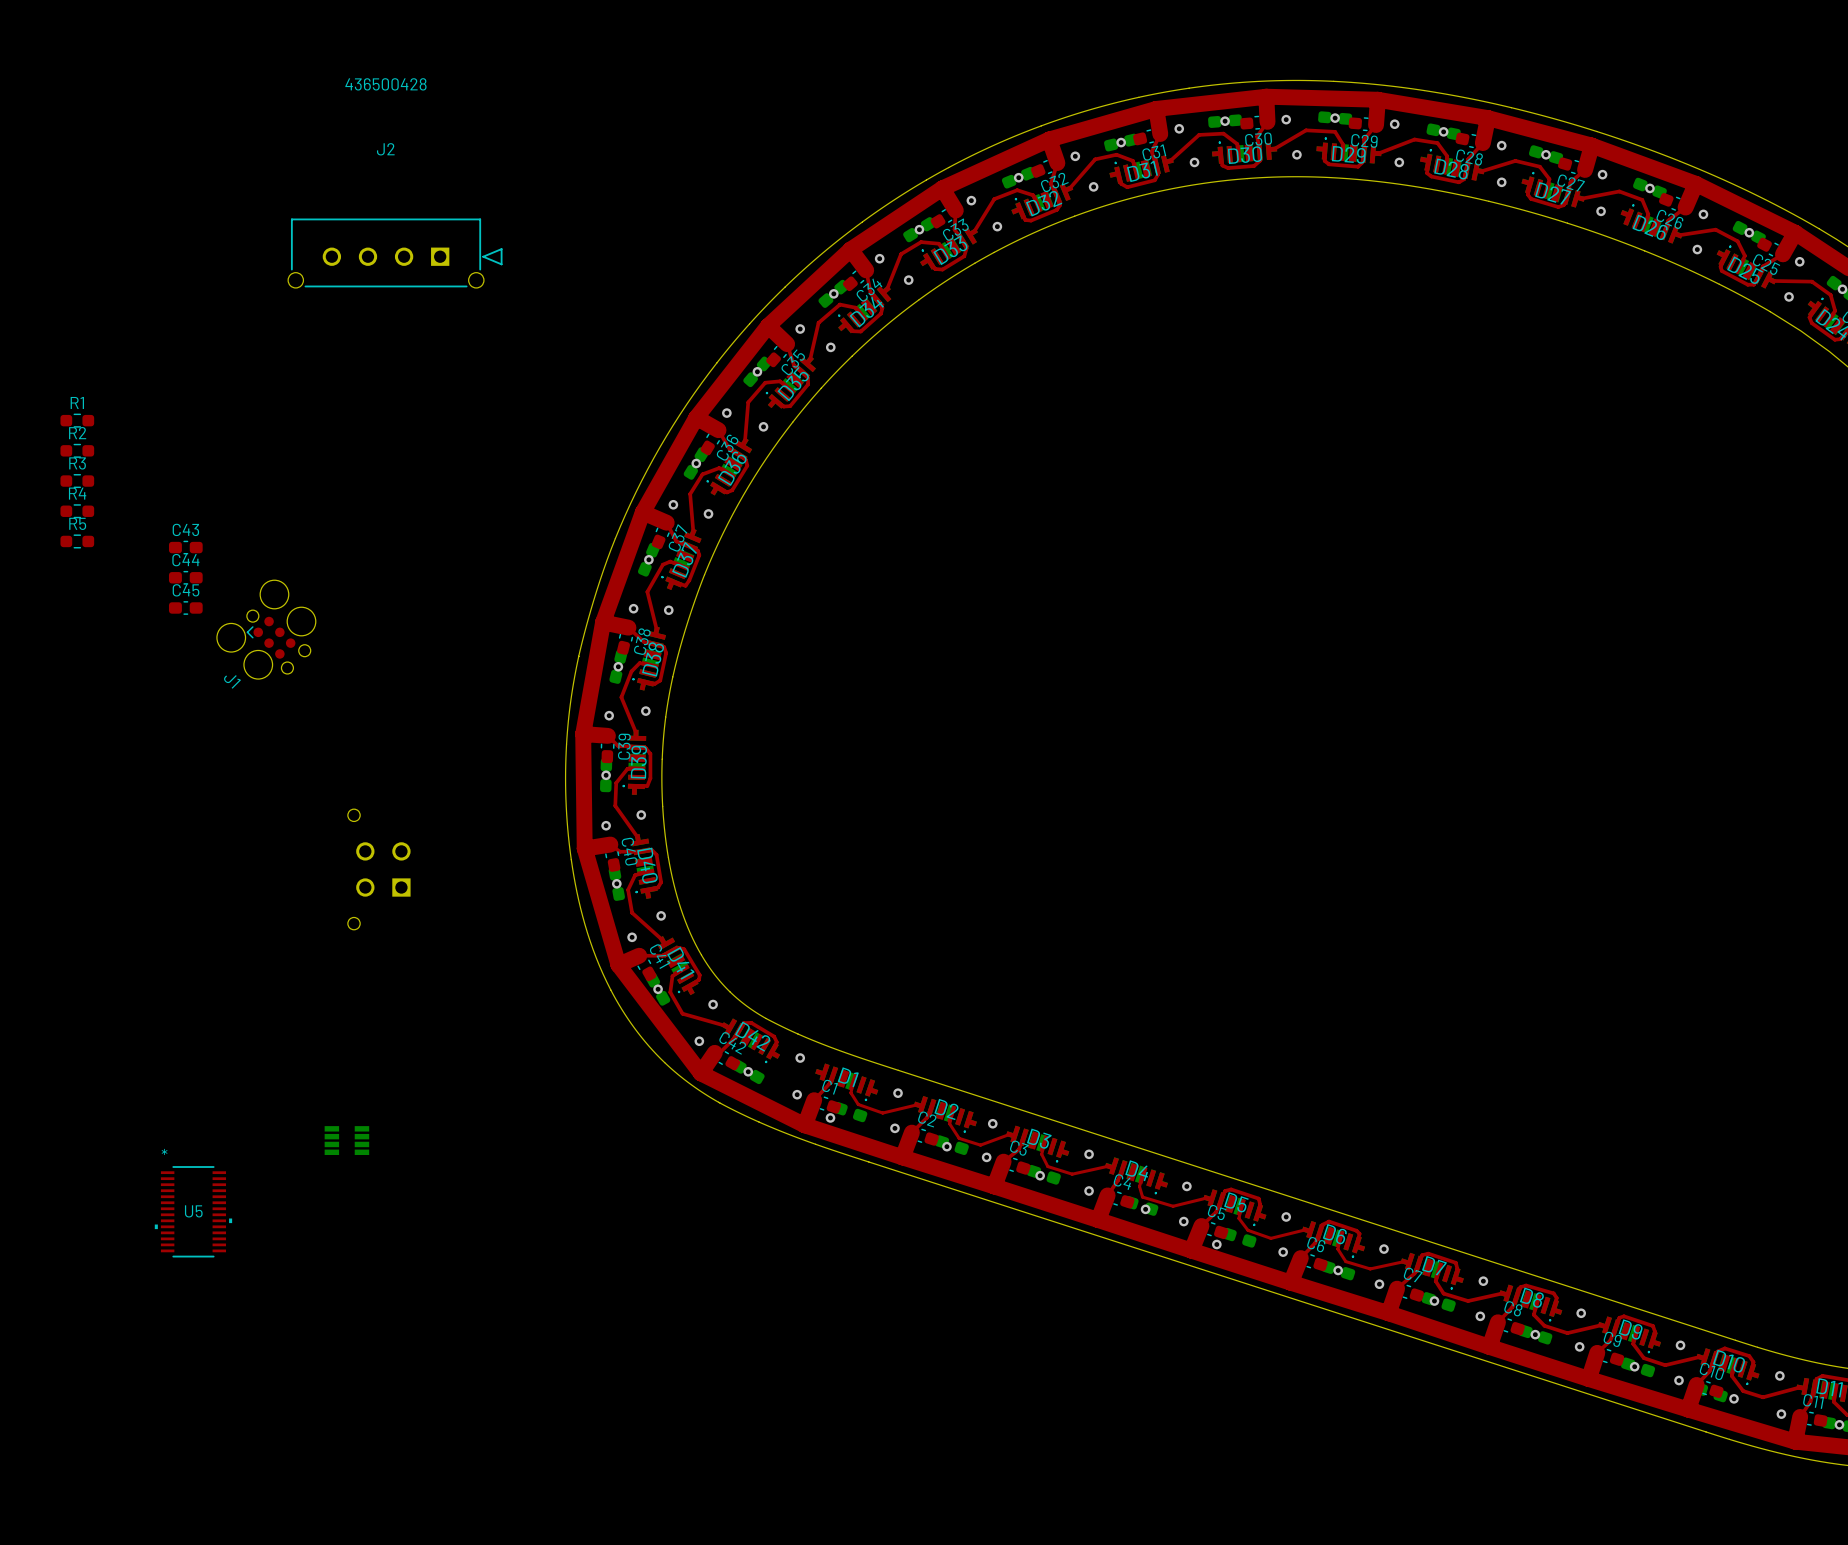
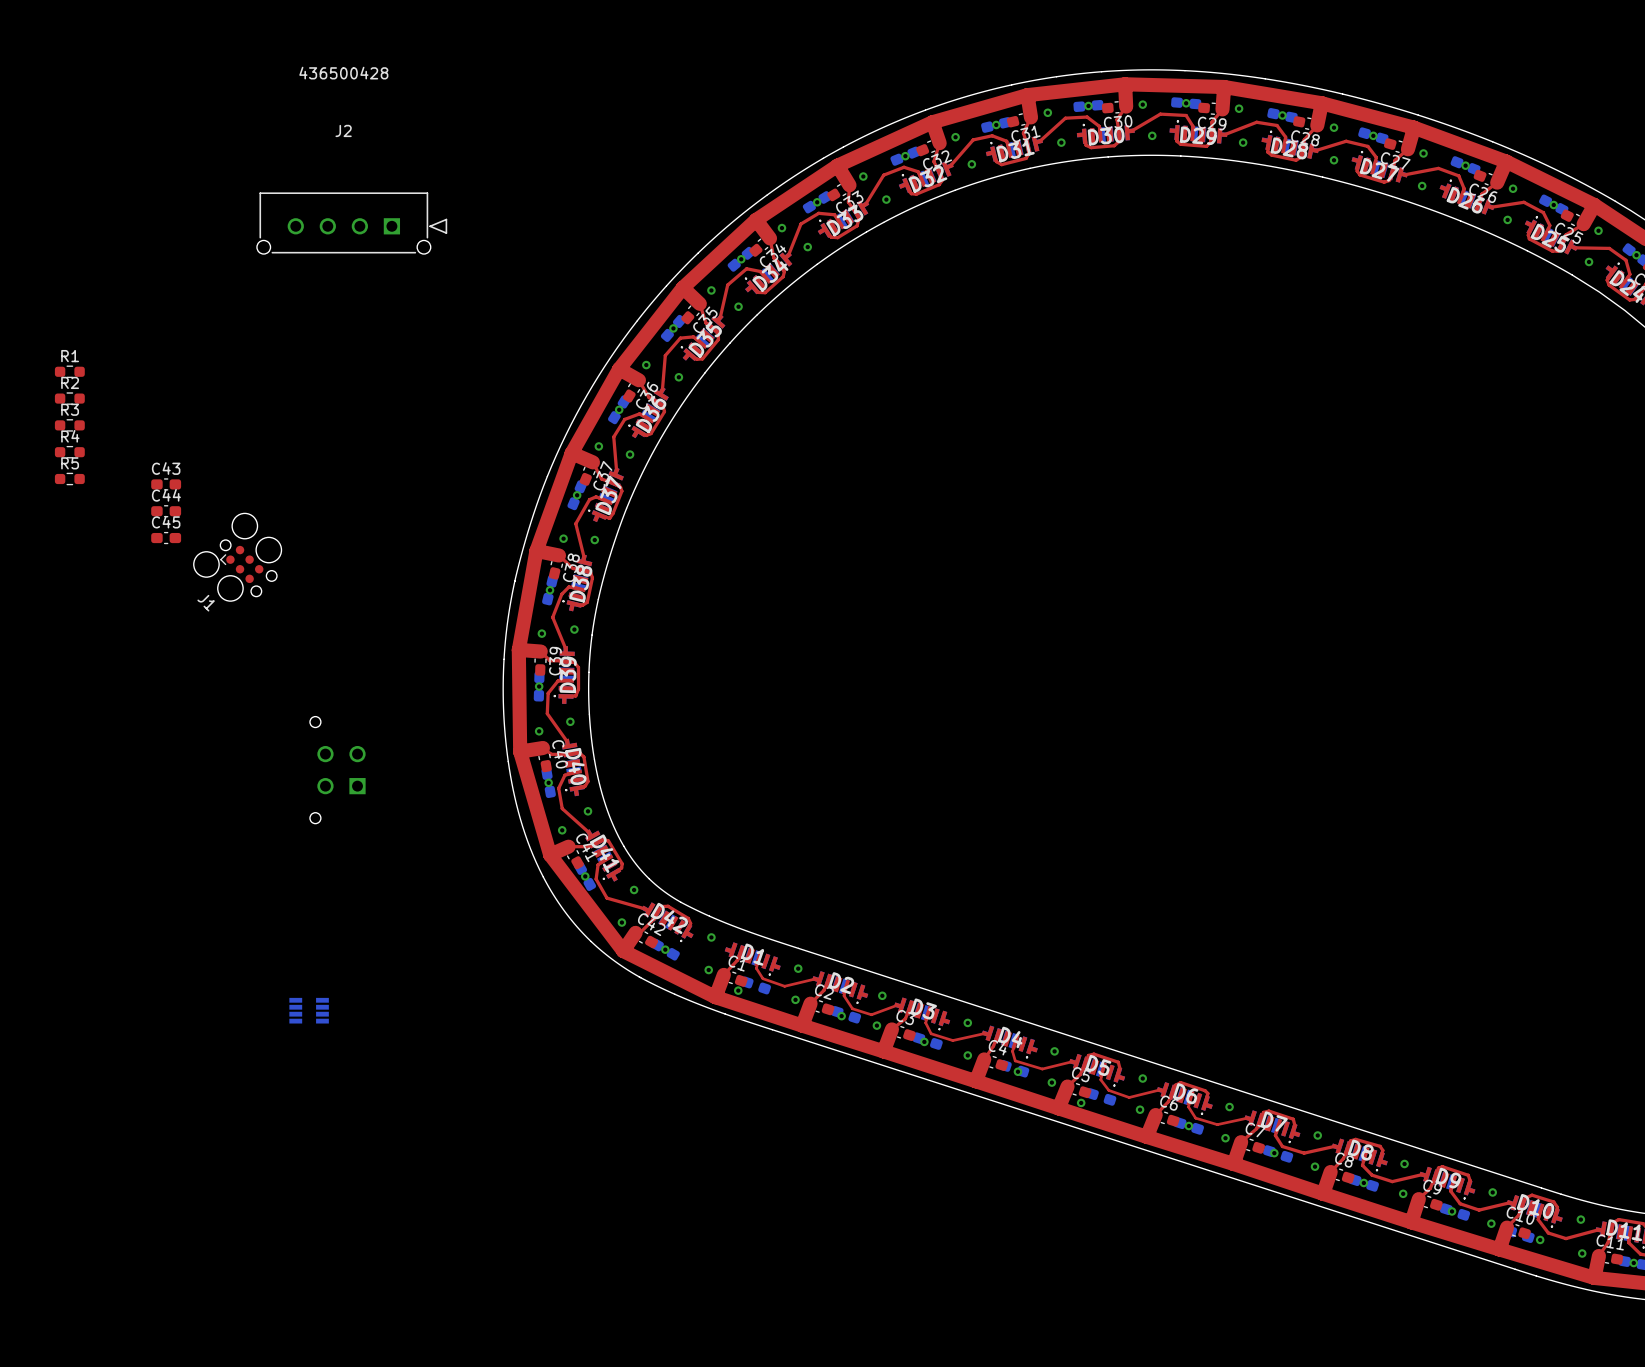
U5: (193, 1211) -> none

